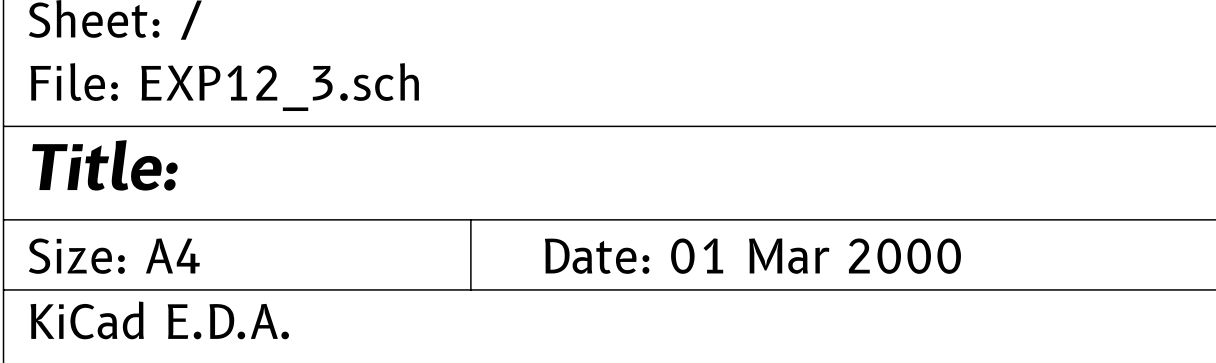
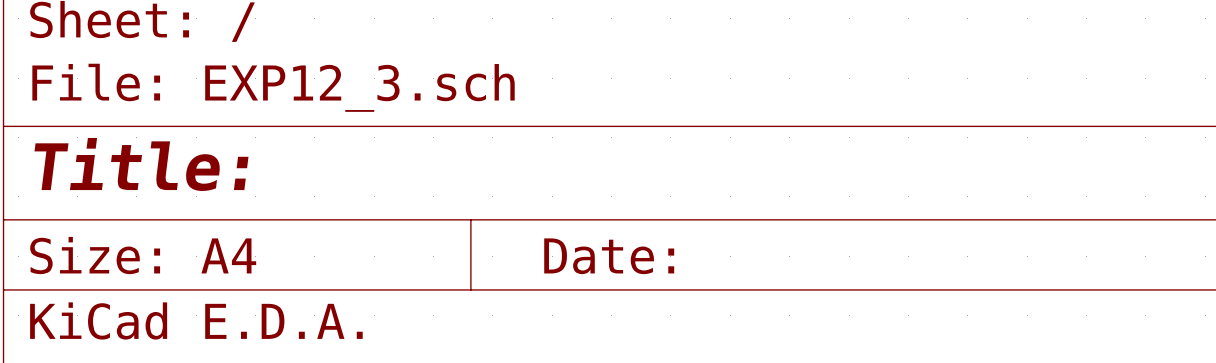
title block: Date: 01 Mar 2000 (752, 256) -> Date: (609, 256)

